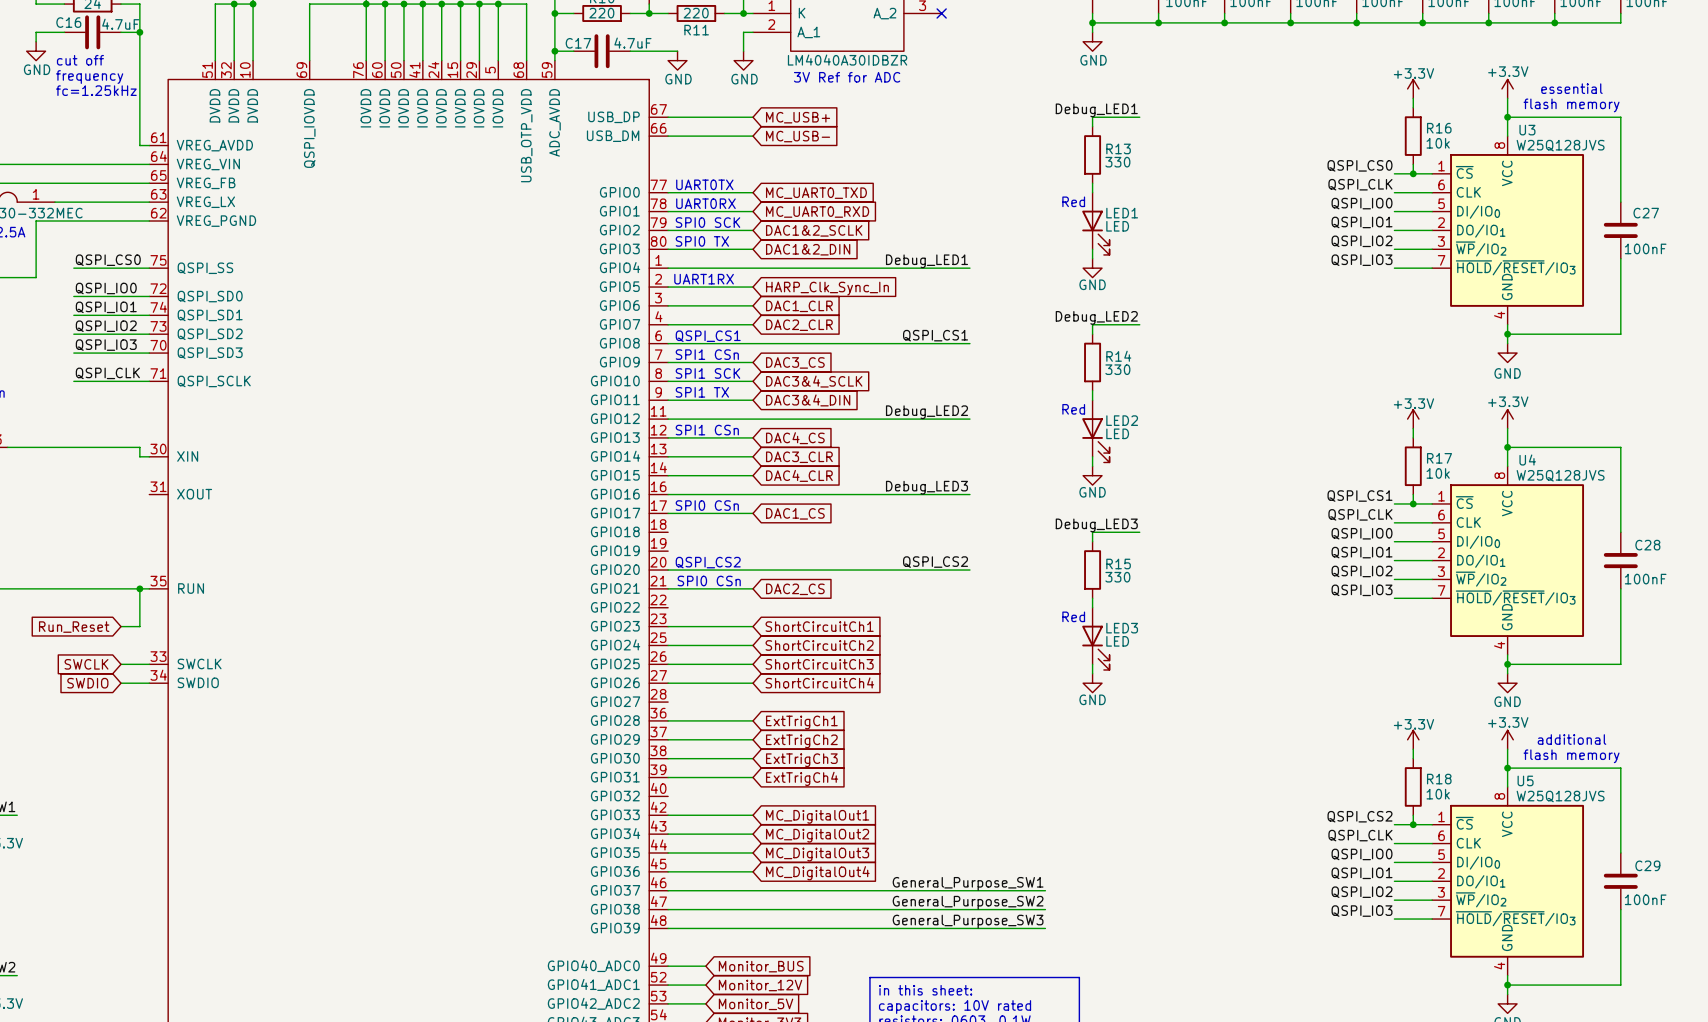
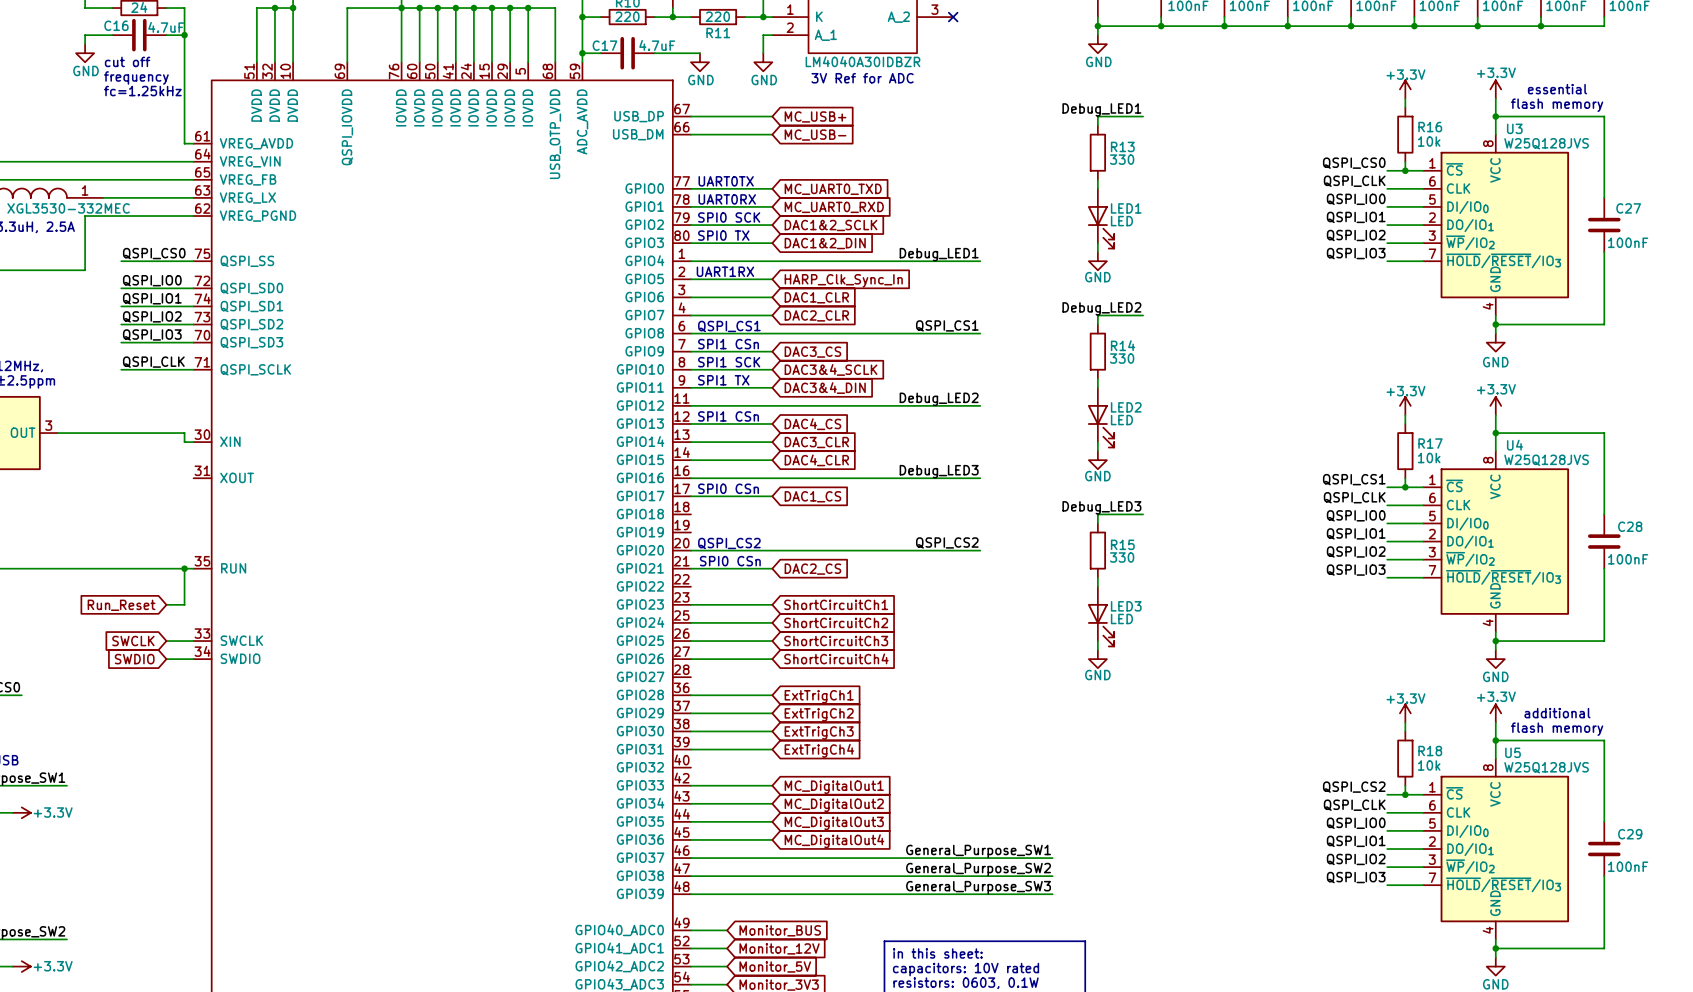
text: Red (1073, 201) -> none
text: Red (1073, 409) -> none
text: Red (1073, 616) -> none

